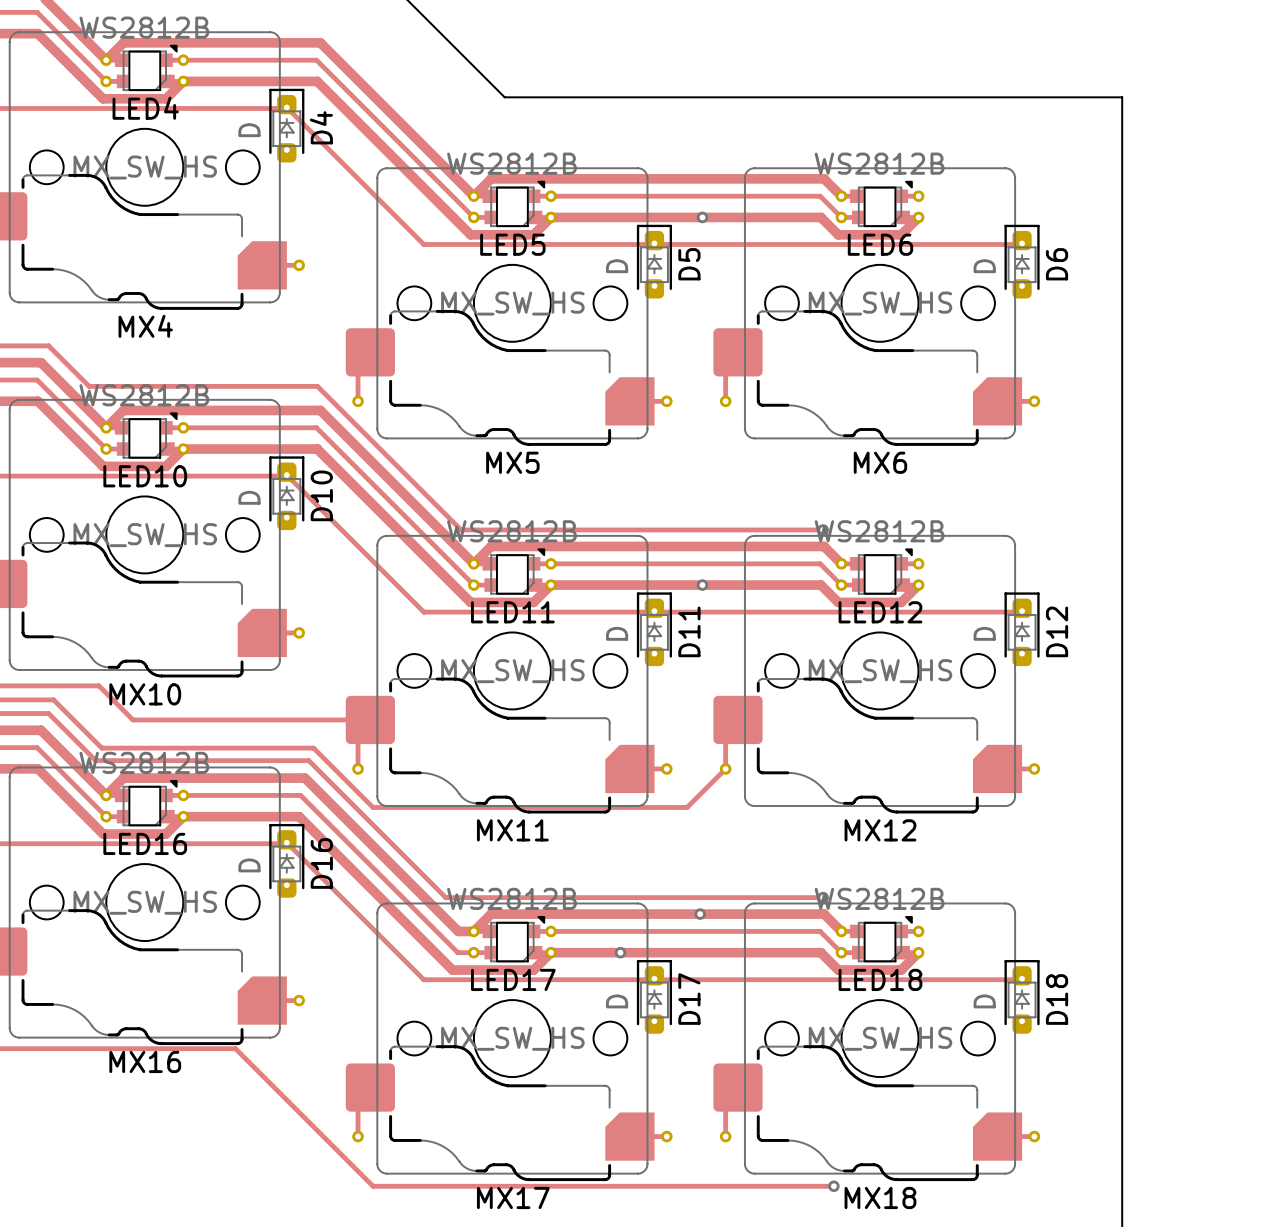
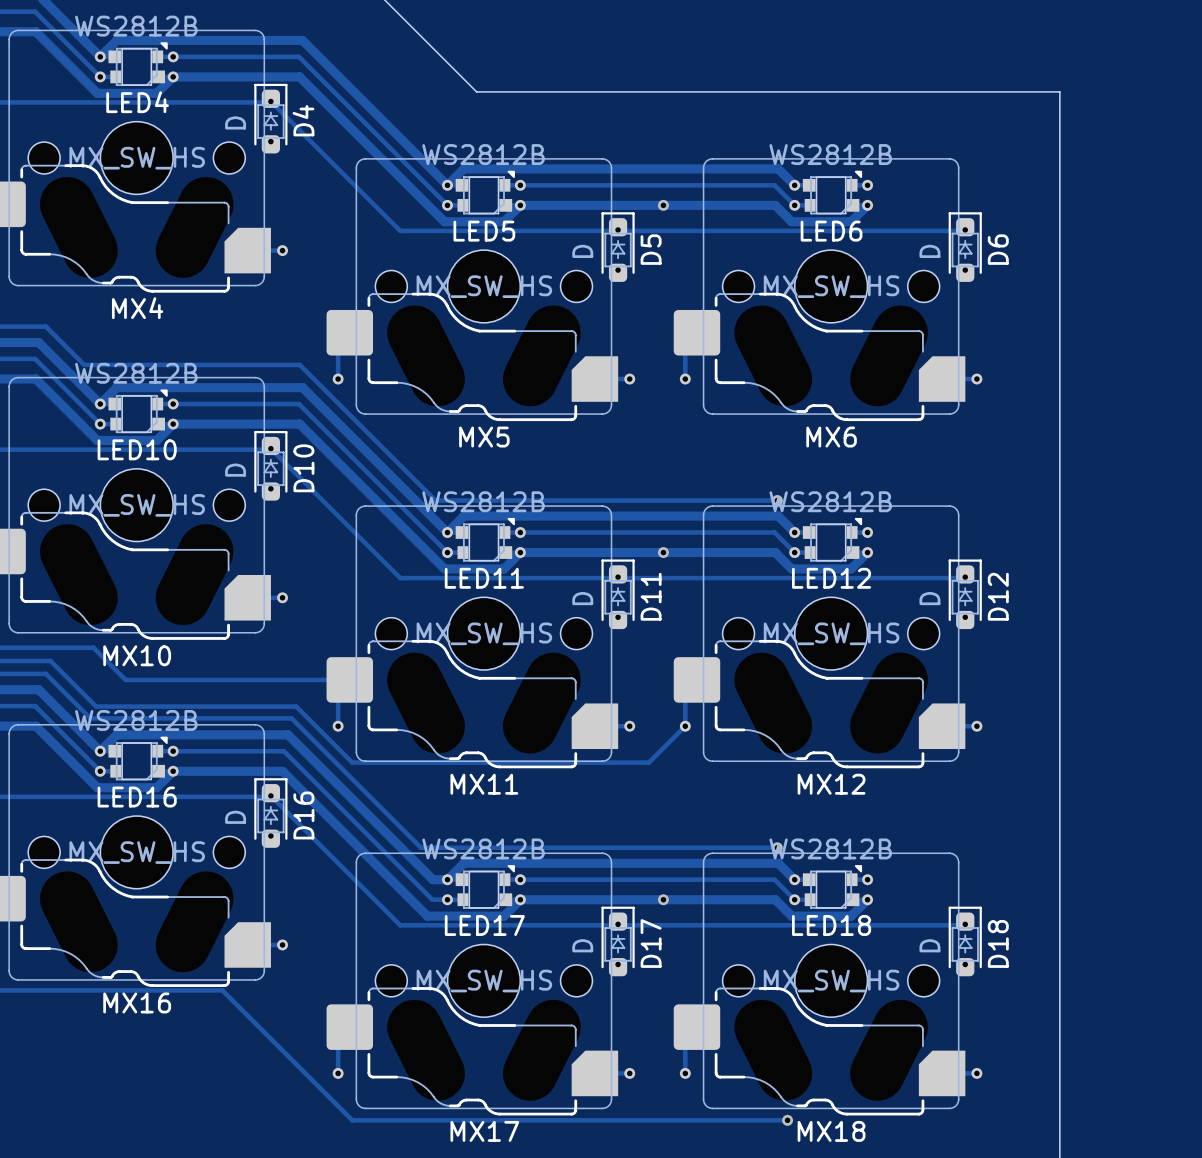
via position: (700, 914) -> (663, 899)
via: (620, 952) -> none

